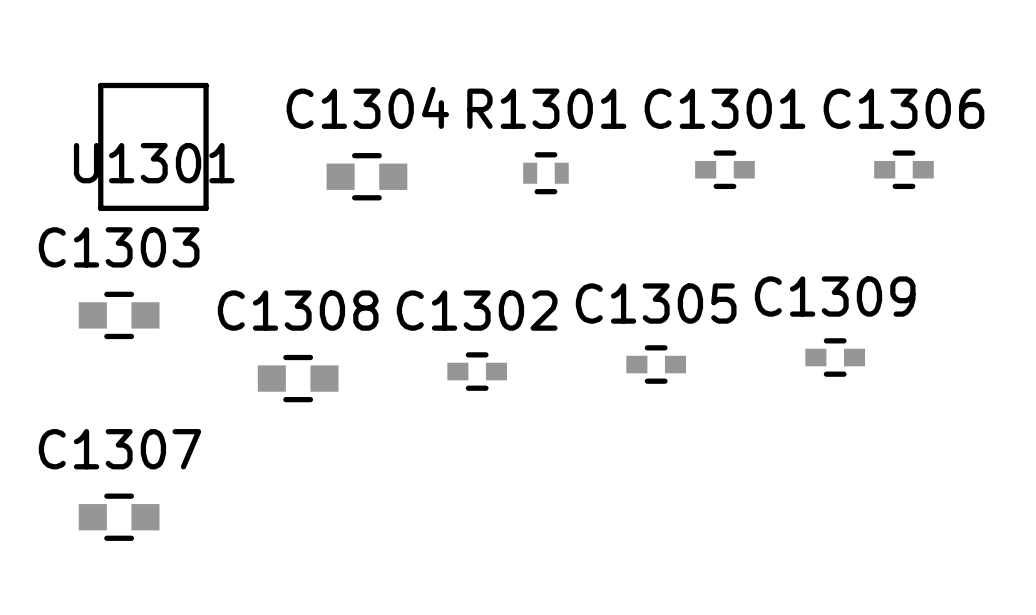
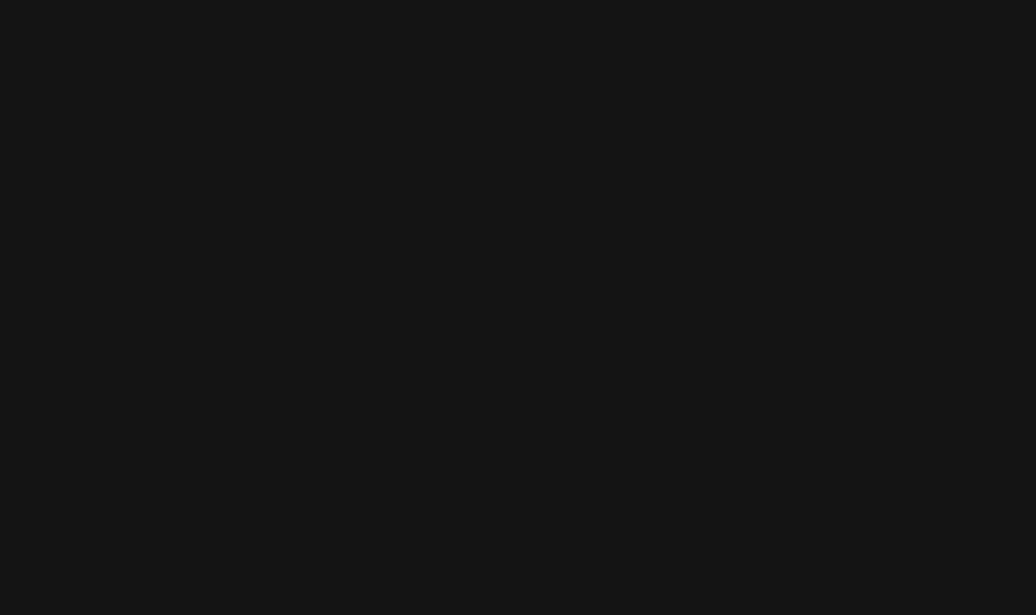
U1301: (153, 146) -> none
C1301: (724, 169) -> none
C1306: (903, 169) -> none
R1301: (545, 173) -> none
C1304: (366, 176) -> none
C1303: (119, 315) -> none
C1309: (835, 357) -> none
C1305: (656, 364) -> none
C1302: (477, 371) -> none
C1308: (298, 378) -> none
C1307: (119, 517) -> none

